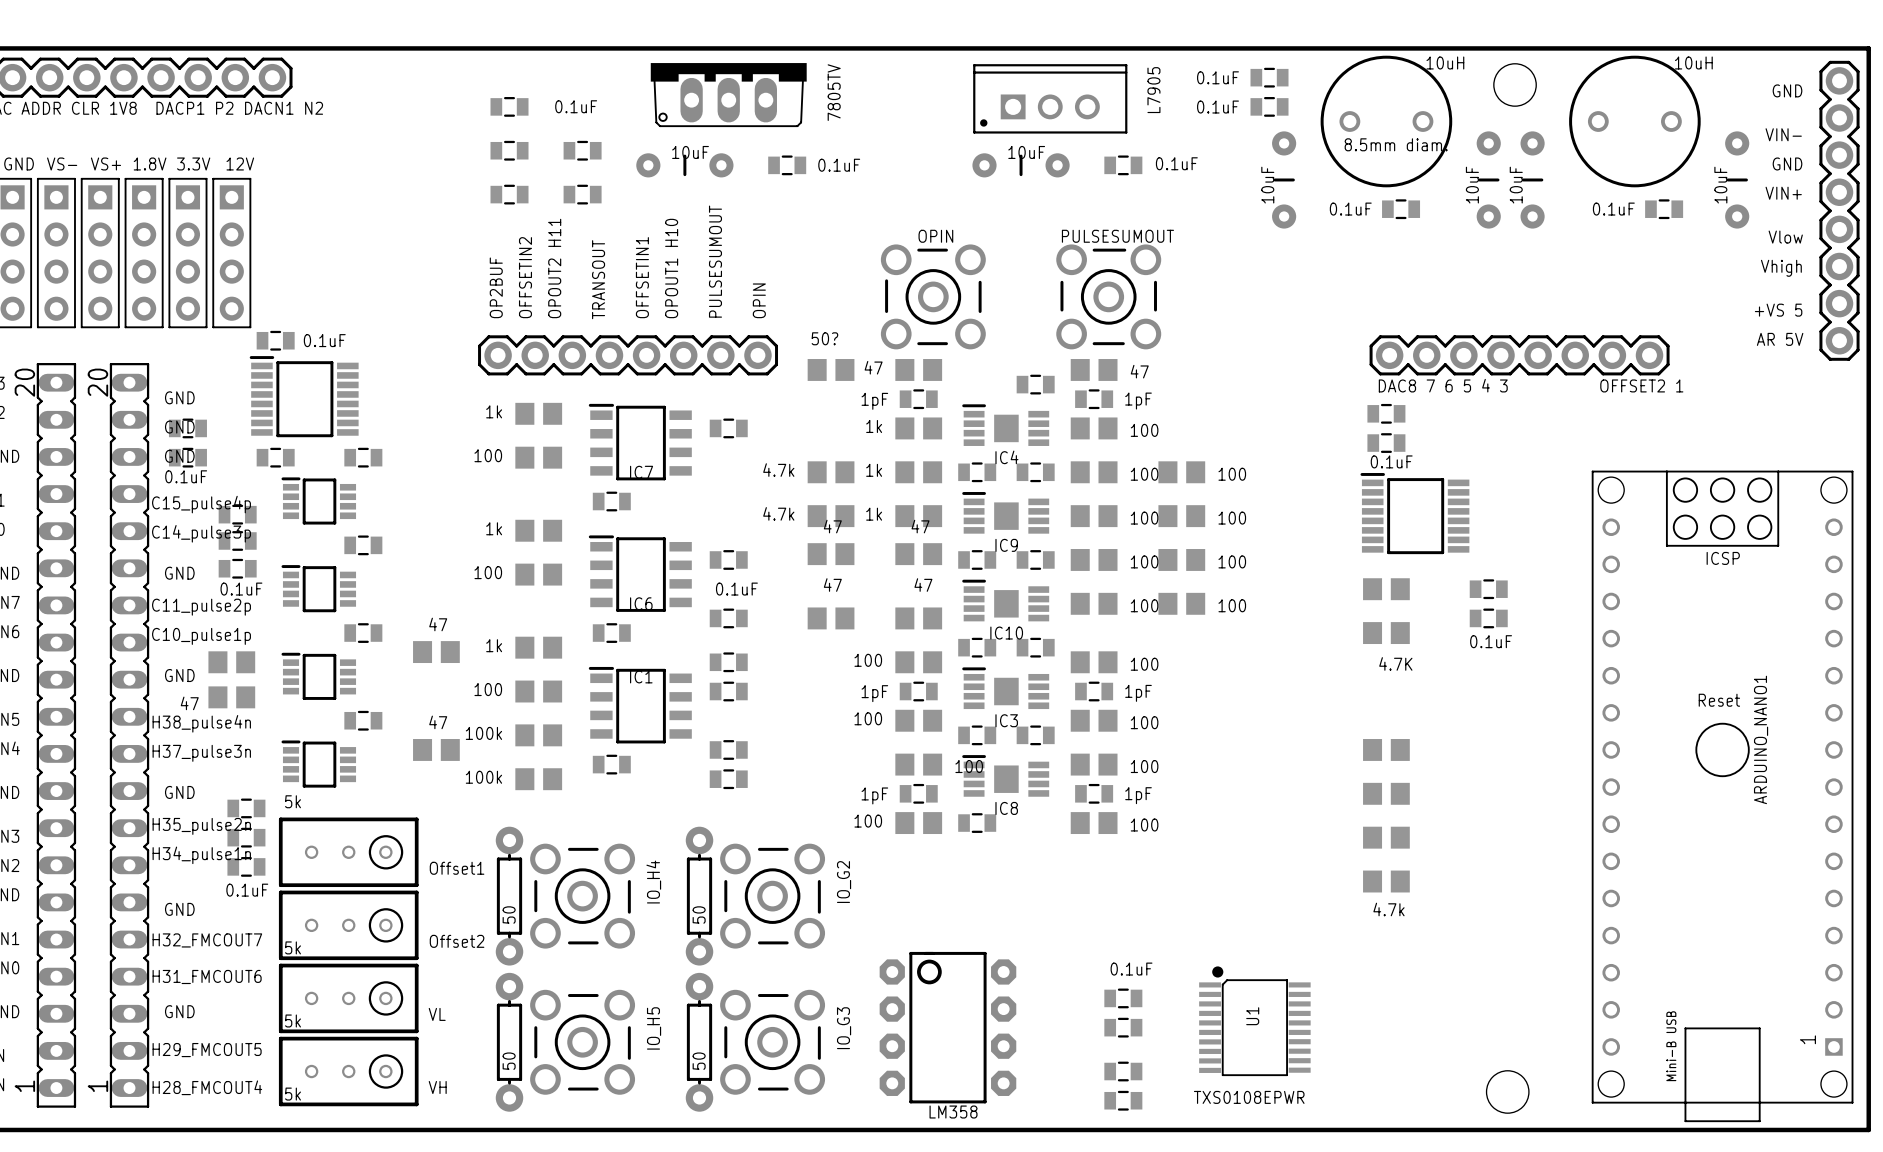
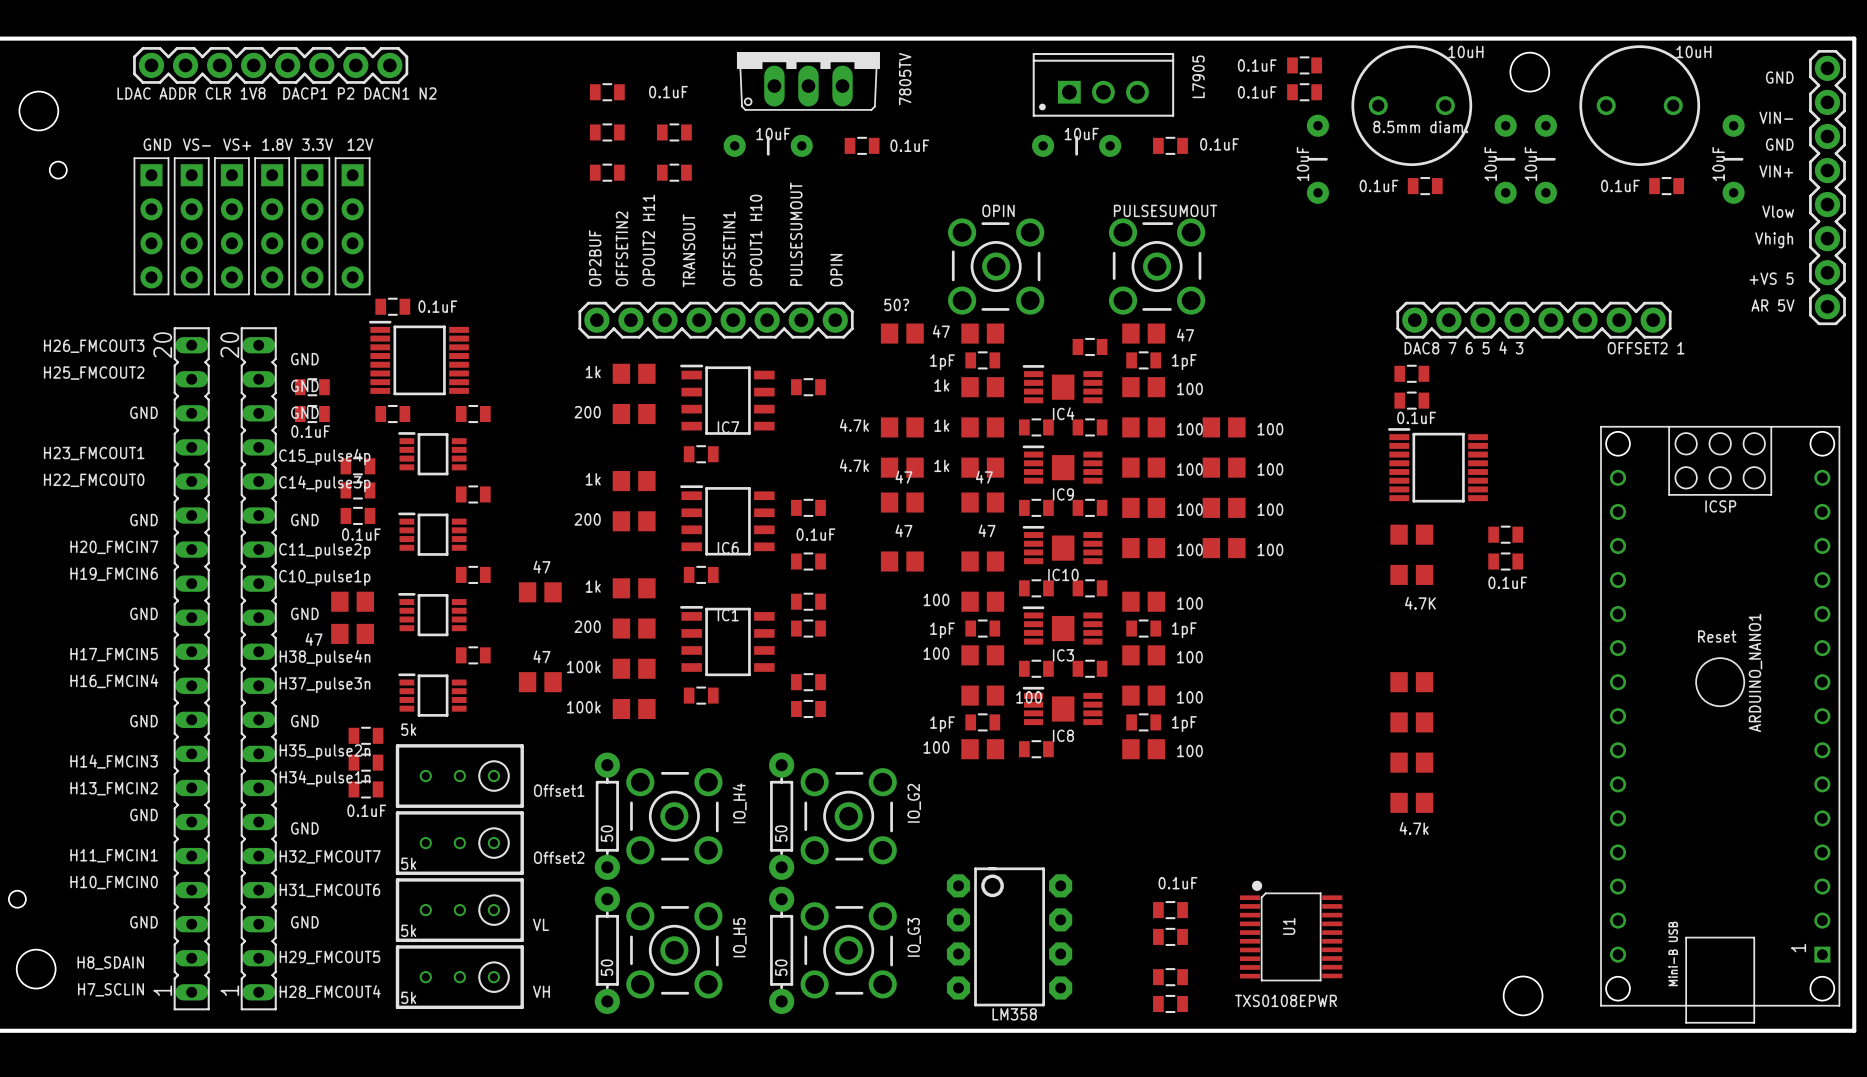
part value: 100 (488, 455) -> 200 (587, 412)
part value: 100 (488, 572) -> 200 (587, 519)
part value: 100 (488, 689) -> 200 (587, 626)

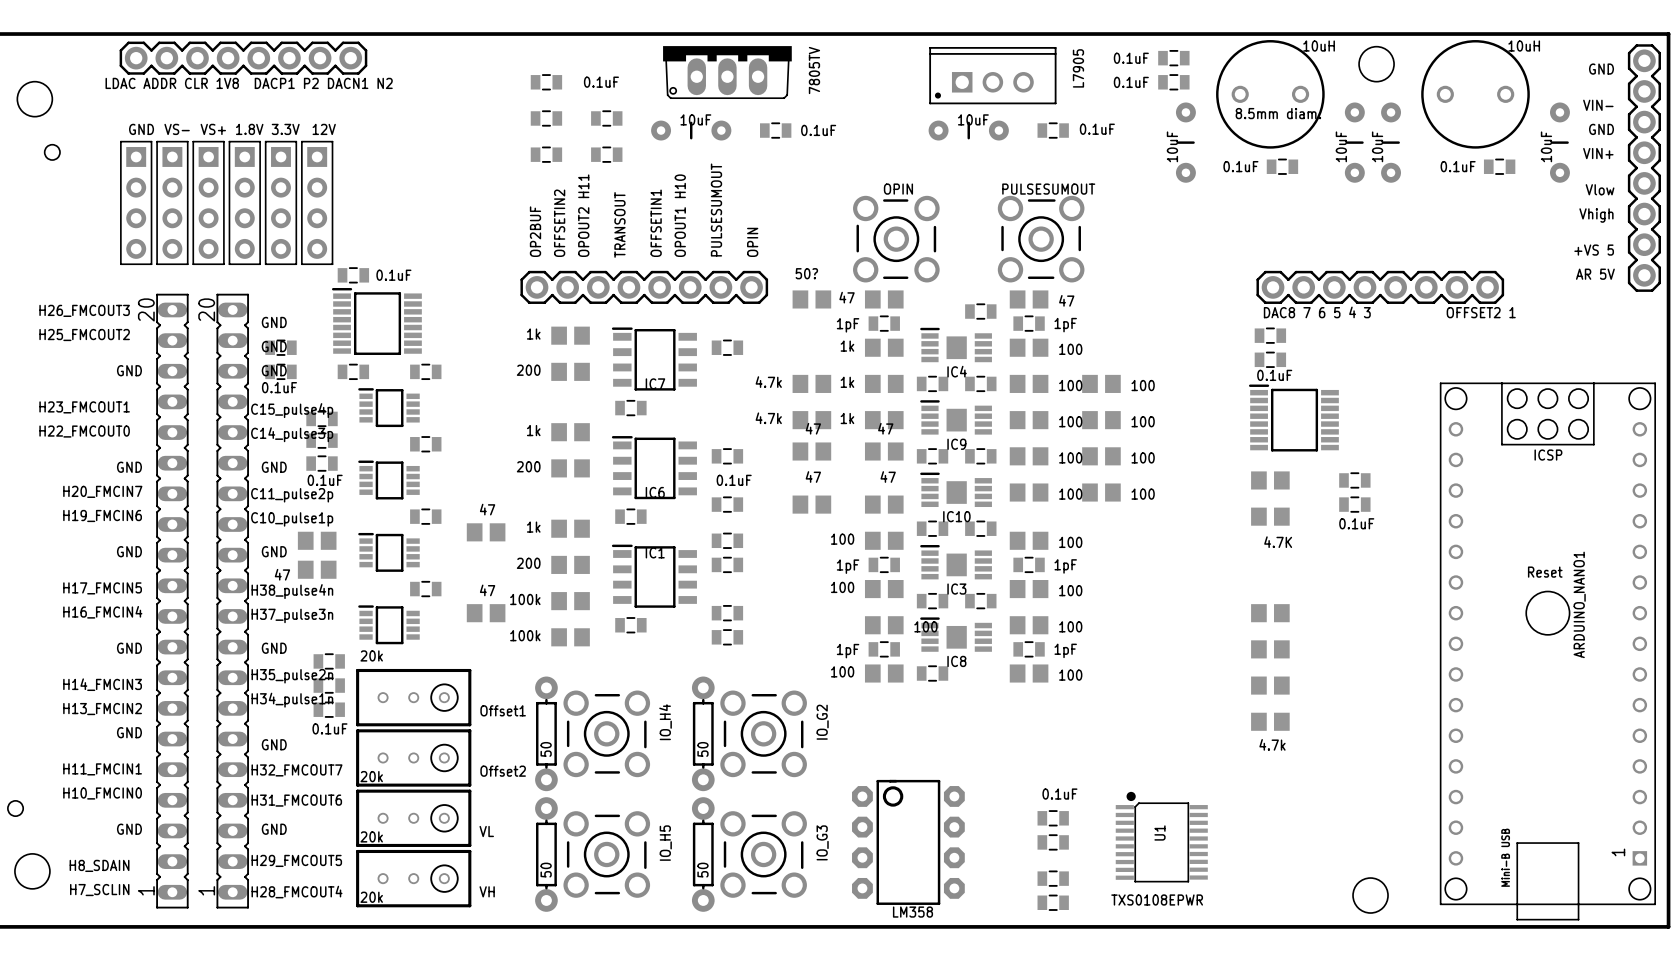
part value: 5k (408, 729) -> 20k (371, 655)
part value: 5k (408, 863) -> 20k (371, 776)
part value: 5k (408, 930) -> 20k (371, 836)
part value: 5k (408, 997) -> 20k (371, 897)

